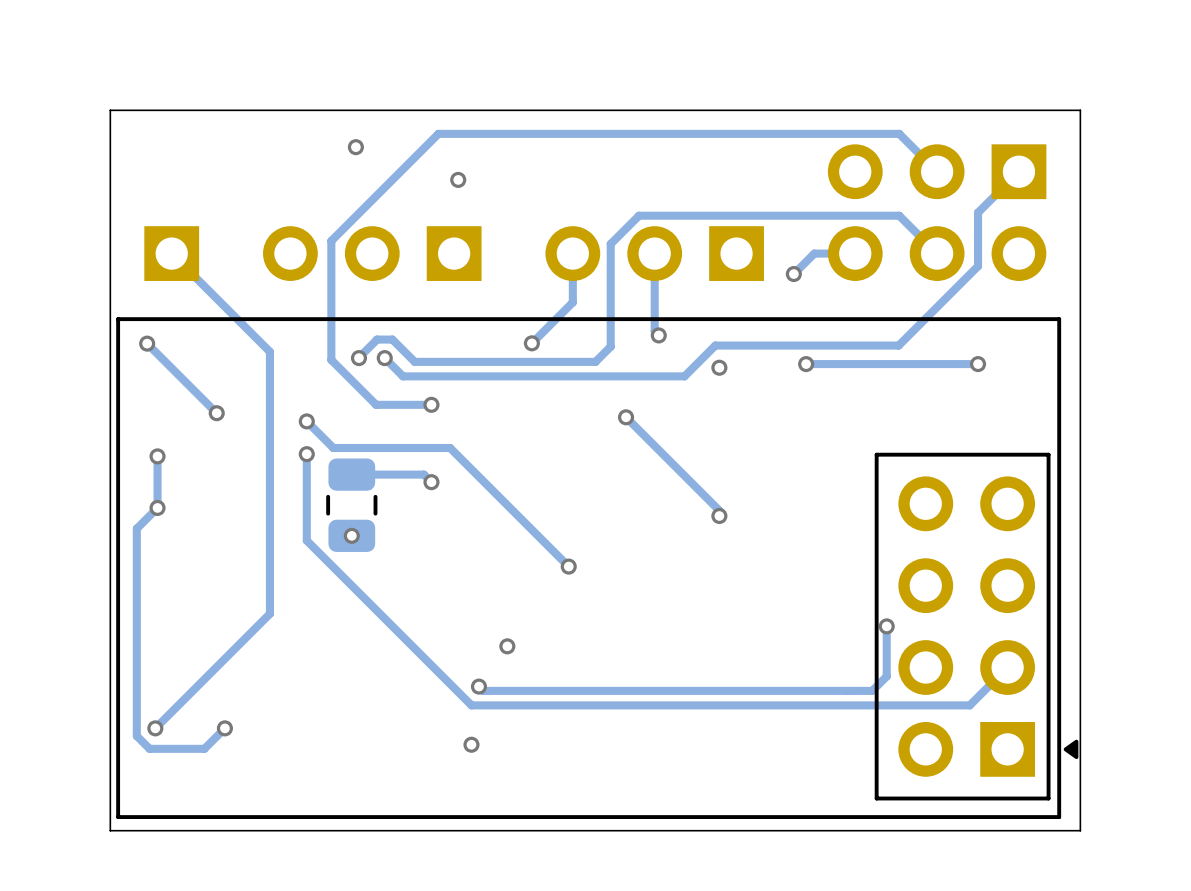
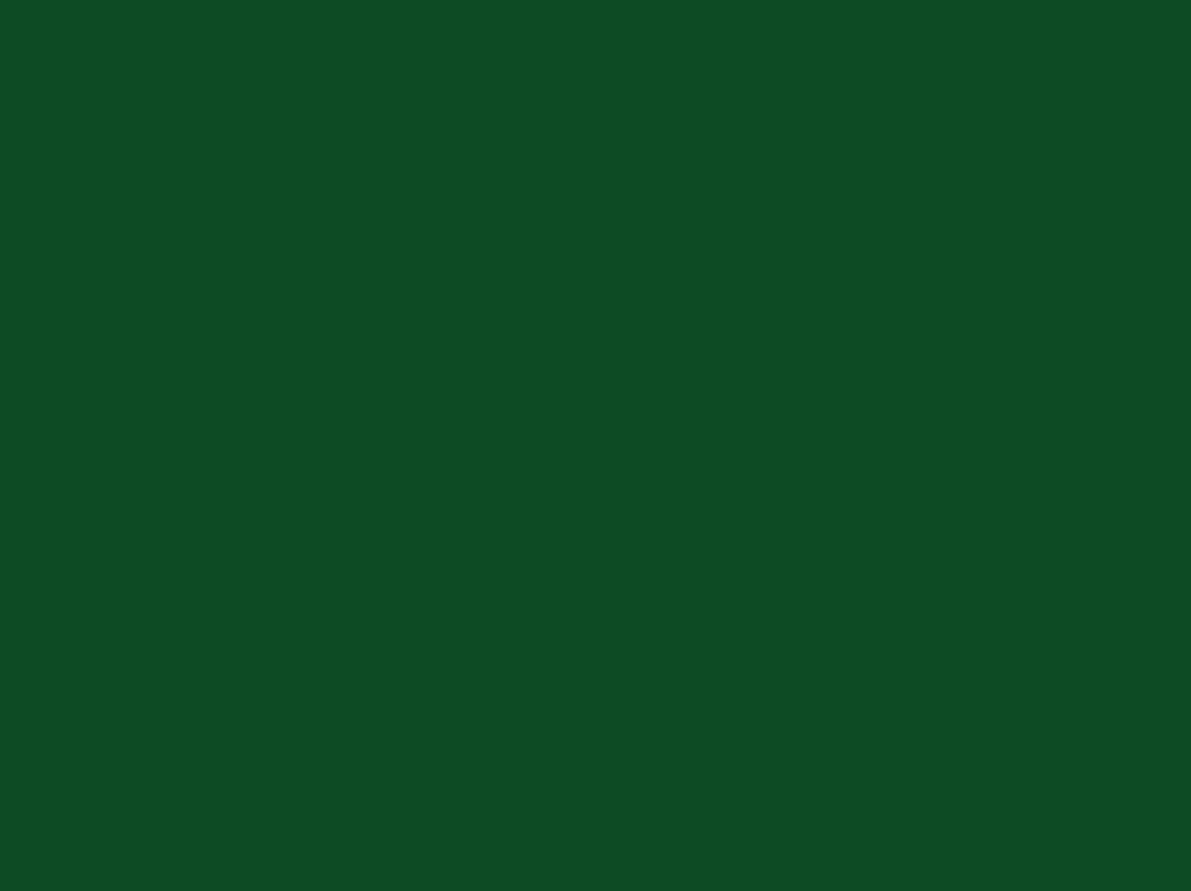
board edge: (1080, 110) (110, 110) (110, 830) (1080, 830) (1080, 110) -> none
via: (355, 147) -> none
track: (937, 171) (899, 133) (438, 133) (331, 240) (331, 360) (376, 404) (431, 404) -> none
track: (1018, 171) (978, 212) (978, 266) (898, 345) (715, 345) (684, 376) (403, 376) (384, 358) -> none
via: (458, 179) -> none
part: (937, 212) -> none
track: (171, 253) (269, 351) (269, 613) (155, 728) -> none
part: (171, 253) -> none
part: (372, 253) -> none
track: (572, 253) (572, 302) (531, 343) -> none
track: (654, 253) (654, 331) (658, 335) -> none
part: (654, 253) -> none
track: (855, 253) (814, 253) (793, 274) -> none
track: (937, 253) (899, 215) (639, 215) (610, 244) (610, 346) (595, 361) (414, 361) (392, 339) (377, 339) (358, 357) -> none
via: (793, 274) -> none
via: (658, 335) -> none
track: (147, 343) (216, 413) -> none
via: (147, 343) -> none
via: (531, 343) -> none
via: (358, 358) -> none
via: (384, 358) -> none
via: (806, 364) -> none
track: (978, 364) (806, 364) -> none
via: (978, 364) -> none
via: (719, 367) -> none
via: (431, 404) -> none
via: (216, 413) -> none
track: (626, 417) (719, 510) (719, 515) -> none
via: (626, 417) -> none
track: (306, 421) (333, 448) (450, 448) (568, 566) -> none
via: (306, 421) -> none
track: (306, 454) (306, 540) (471, 705) (969, 705) (1007, 667) -> none
via: (306, 454) -> none
track: (157, 456) (157, 507) (136, 528) (136, 736) (149, 748) (204, 748) (224, 728) -> none
via: (157, 456) -> none
track: (351, 474) (423, 474) (431, 482) -> none
via: (431, 482) -> none
part: (351, 505) -> none
via: (157, 507) -> none
via: (719, 515) -> none
via: (351, 535) -> none
via: (568, 566) -> none
part: (597, 568) -> none
track: (886, 626) (886, 676) (872, 690) (483, 690) (478, 686) -> none
via: (886, 626) -> none
via: (507, 646) -> none
via: (478, 686) -> none
via: (155, 728) -> none
via: (224, 728) -> none
via: (471, 744) -> none

